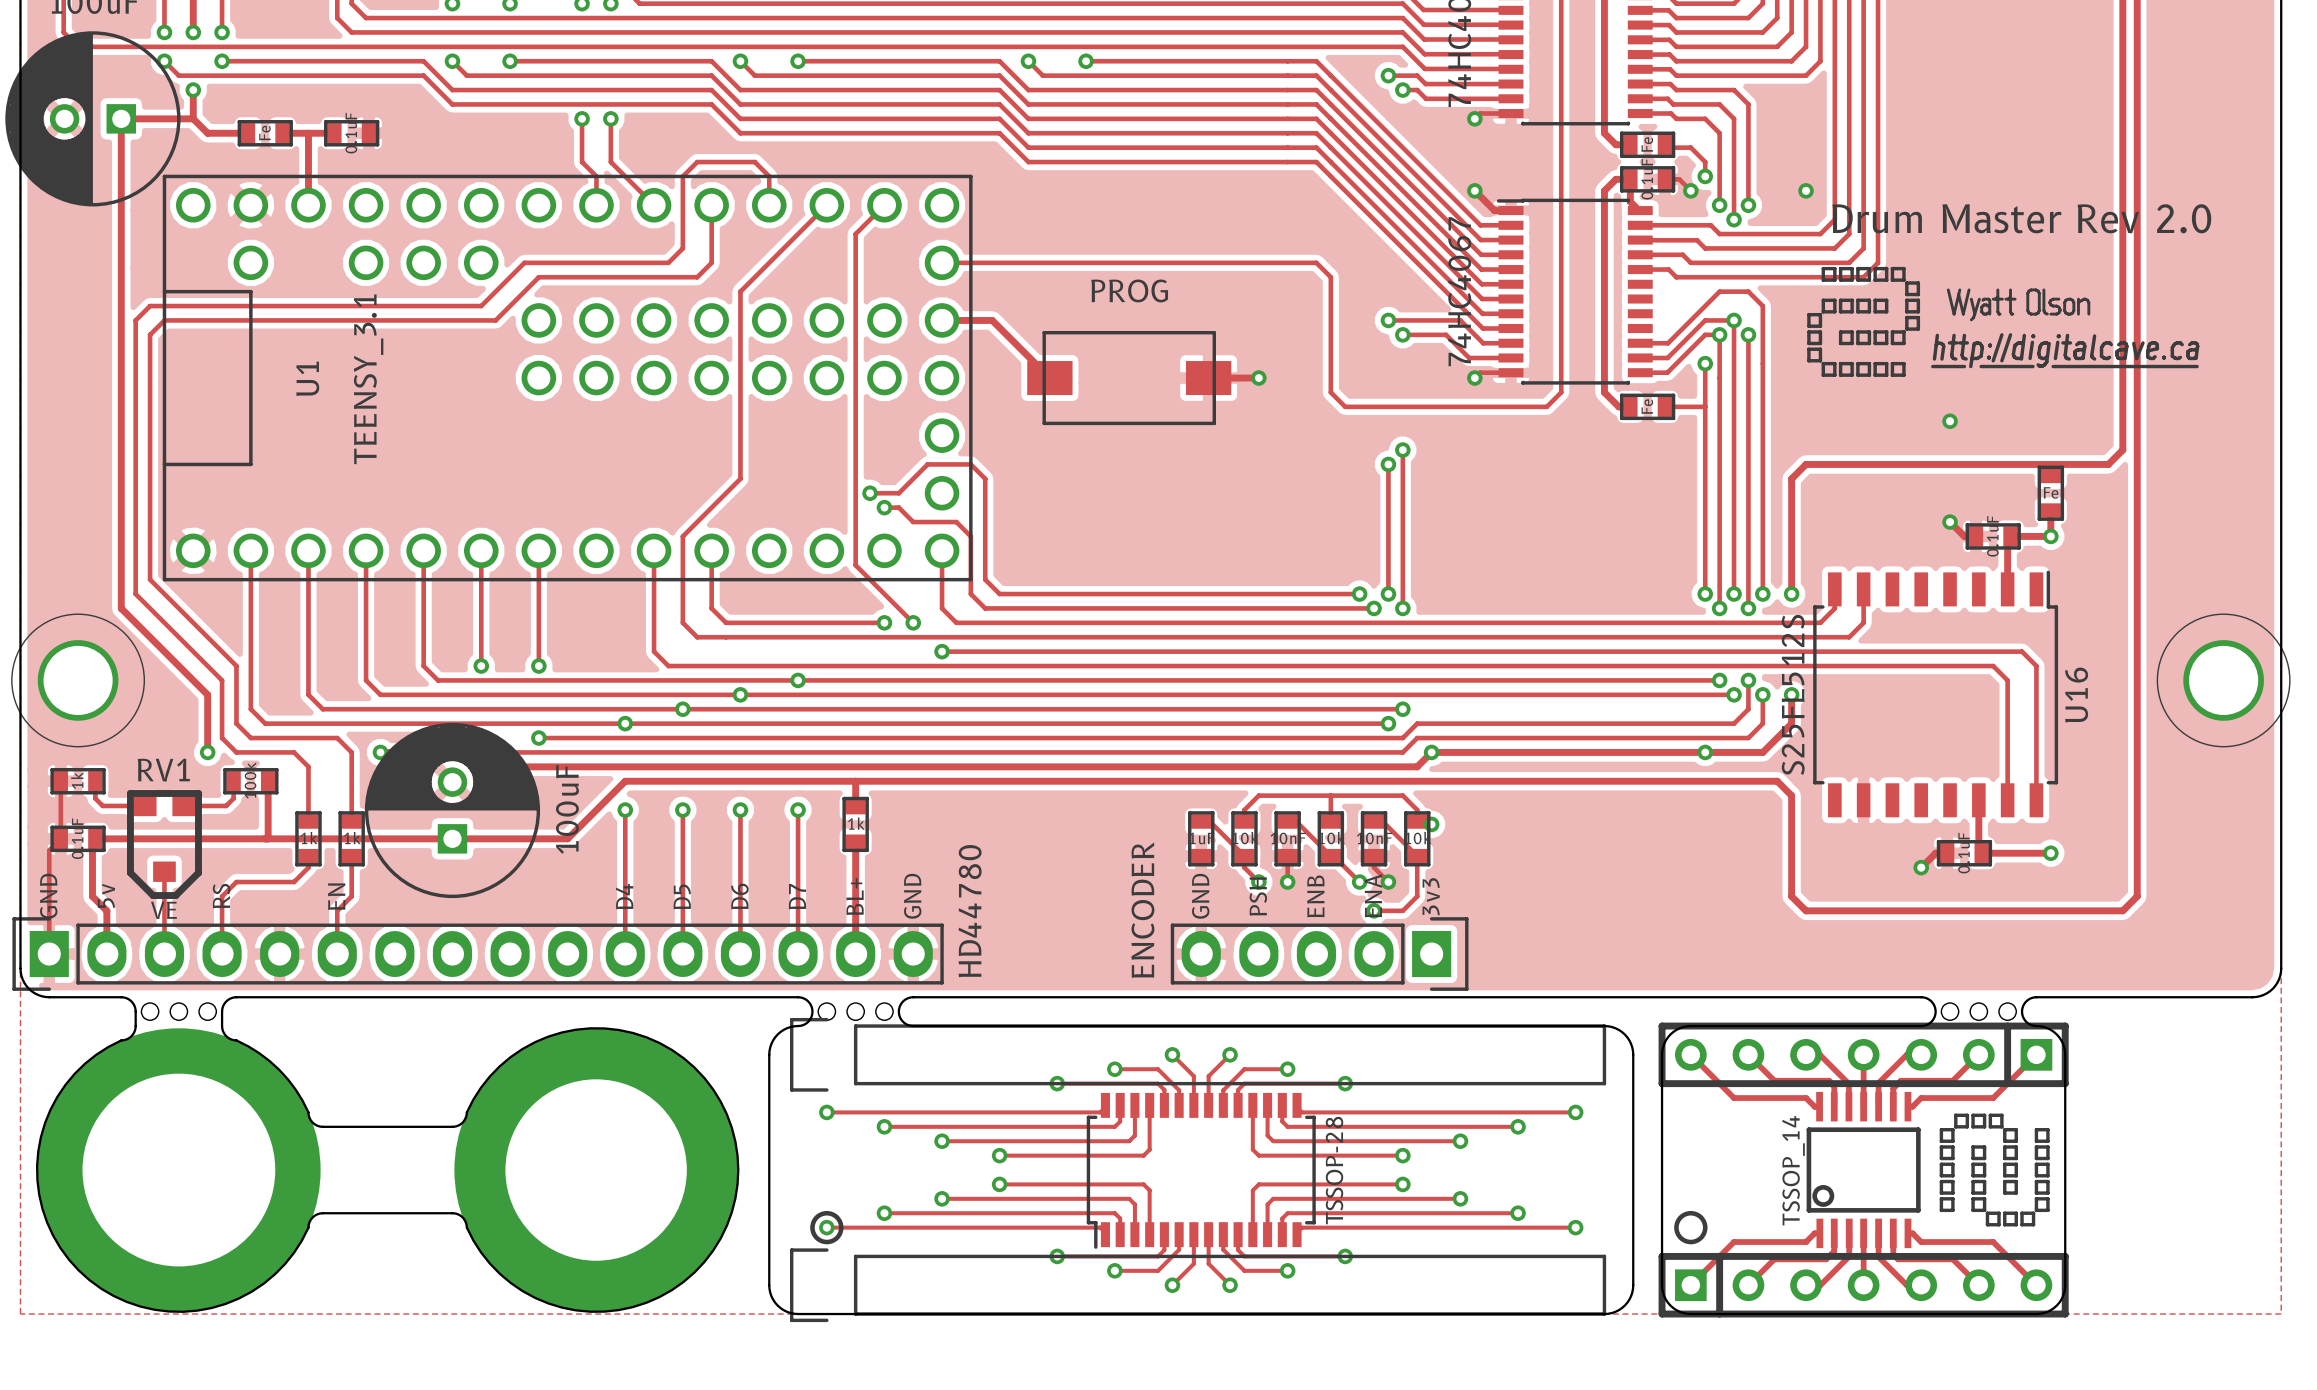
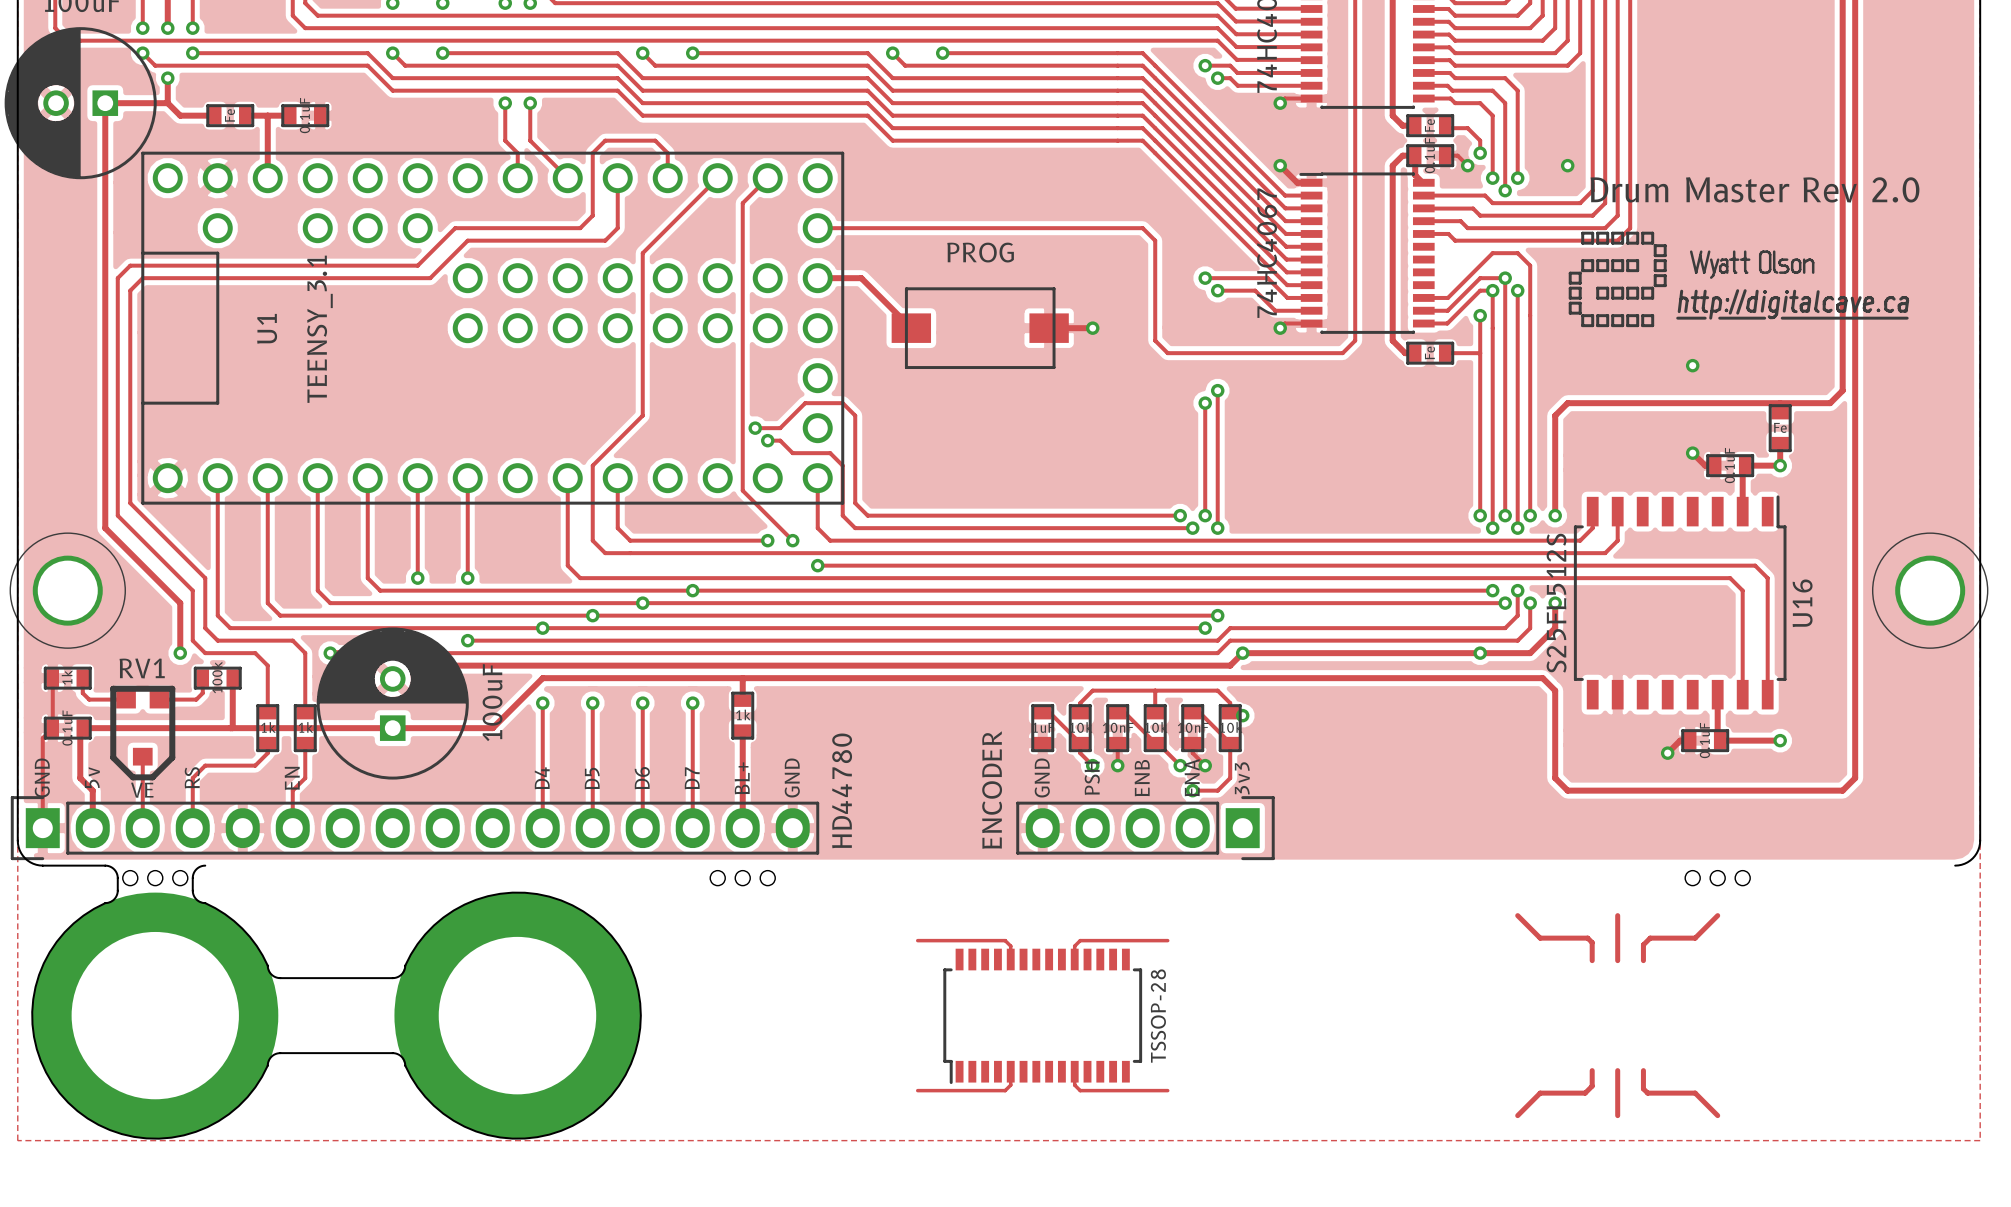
board edge: (236, 997) (798, 997) (805, 999) (811, 1007) (810, 1018) (803, 1024) (790, 1027) (780, 1031) (773, 1040) (769, 1054) (769, 1288) (775, 1302) (790, 1313) (1604, 1314) -> none
board edge: (913, 997) (1924, 997) (1932, 1002) (1935, 1011) (1932, 1020) (1923, 1025) (1690, 1026) (1679, 1028) (1667, 1037) (1662, 1054) (1662, 1285) (1664, 1296) (1673, 1308) (1690, 1314) (2036, 1314) -> none
board edge: (913, 997) (903, 1001) (898, 1011) (903, 1021) (913, 1026) (1604, 1026) (1615, 1028) (1627, 1037) (1632, 1051) (1633, 1285) (1631, 1296) (1624, 1305) (1615, 1311) (1604, 1314) -> none
board edge: (2036, 997) (2252, 997) -> none
board edge: (2036, 997) (2029, 999) (2023, 1004) (2022, 1011) (2023, 1018) (2030, 1024) (2043, 1027) (2053, 1031) (2061, 1040) (2065, 1054) (2064, 1288) (2061, 1299) (2053, 1308) (2036, 1314) -> none
track: (1172, 1054) (1193, 1076) (1193, 1105) -> none
via: (1172, 1054) -> none
part: (1198, 1054) -> none
track: (1230, 1054) (1208, 1076) (1208, 1105) -> none
via: (1230, 1054) -> none
track: (1690, 1054) (1734, 1098) (1806, 1098) (1814, 1106) (1819, 1106) -> none
track: (1806, 1054) (1819, 1054) (1848, 1083) (1848, 1106) -> none
part: (1863, 1054) -> none
track: (1921, 1054) (1906, 1054) (1878, 1083) (1878, 1106) -> none
track: (2036, 1054) (1993, 1098) (1921, 1098) (1912, 1106) (1907, 1106) -> none
track: (1114, 1069) (1158, 1069) (1179, 1090) (1179, 1105) -> none
via: (1114, 1069) -> none
track: (1287, 1069) (1244, 1069) (1223, 1090) (1223, 1105) -> none
via: (1287, 1069) -> none
via: (1057, 1083) -> none
via: (1345, 1083) -> none
track: (1105, 1105) (1100, 1112) (826, 1112) -> none
track: (1120, 1105) (1120, 1121) (1114, 1126) (884, 1126) -> none
track: (1134, 1105) (1134, 1135) (1129, 1141) (942, 1141) -> none
track: (1149, 1105) (1149, 1149) (1143, 1155) (999, 1155) -> none
track: (1252, 1105) (1252, 1149) (1258, 1155) (1402, 1155) -> none
track: (1267, 1105) (1267, 1135) (1273, 1141) (1460, 1141) -> none
track: (1282, 1105) (1282, 1121) (1287, 1126) (1518, 1126) -> none
track: (1297, 1105) (1302, 1112) (1575, 1112) -> none
via: (826, 1112) -> none
via: (1575, 1112) -> none
drawing: [1939, 1113, 2050, 1227] -> none
via: (884, 1126) -> none
via: (1518, 1126) -> none
via: (942, 1141) -> none
via: (1460, 1141) -> none
via: (999, 1155) -> none
via: (1402, 1155) -> none
part: TSSOP_14 (1863, 1170) -> none
track: (999, 1184) (1143, 1184) (1149, 1190) (1149, 1234) -> none
via: (999, 1184) -> none
track: (1402, 1184) (1258, 1184) (1252, 1190) (1252, 1234) -> none
via: (1402, 1184) -> none
track: (942, 1198) (1129, 1198) (1134, 1204) (1134, 1234) -> none
via: (942, 1198) -> none
track: (1460, 1198) (1273, 1198) (1267, 1204) (1267, 1234) -> none
via: (1460, 1198) -> none
drawing: [810, 1210, 844, 1245] -> none
drawing: [1674, 1210, 1708, 1245] -> none
track: (884, 1213) (1114, 1213) (1120, 1218) (1120, 1234) -> none
via: (884, 1213) -> none
track: (1518, 1213) (1287, 1213) (1282, 1218) (1282, 1234) -> none
via: (1518, 1213) -> none
track: (826, 1227) (1100, 1227) (1105, 1234) -> none
via: (826, 1227) -> none
track: (1575, 1227) (1302, 1227) (1297, 1234) -> none
via: (1575, 1227) -> none
track: (1819, 1233) (1814, 1233) (1806, 1242) (1734, 1242) (1690, 1285) -> none
track: (1849, 1233) (1849, 1256) (1820, 1285) (1806, 1285) -> none
track: (1878, 1233) (1878, 1257) (1906, 1285) (1921, 1285) -> none
track: (1907, 1233) (1912, 1233) (1921, 1242) (1993, 1242) (2036, 1285) -> none
track: (1179, 1234) (1179, 1249) (1158, 1270) (1114, 1270) -> none
track: (1193, 1234) (1193, 1263) (1172, 1285) -> none
track: (1208, 1234) (1208, 1263) (1230, 1285) -> none
track: (1223, 1234) (1223, 1249) (1244, 1270) (1287, 1270) -> none
via: (1057, 1256) -> none
via: (1345, 1256) -> none
via: (1114, 1270) -> none
via: (1287, 1270) -> none
via: (1172, 1285) -> none
part: (1198, 1285) -> none
via: (1230, 1285) -> none
part: (1863, 1285) -> none

